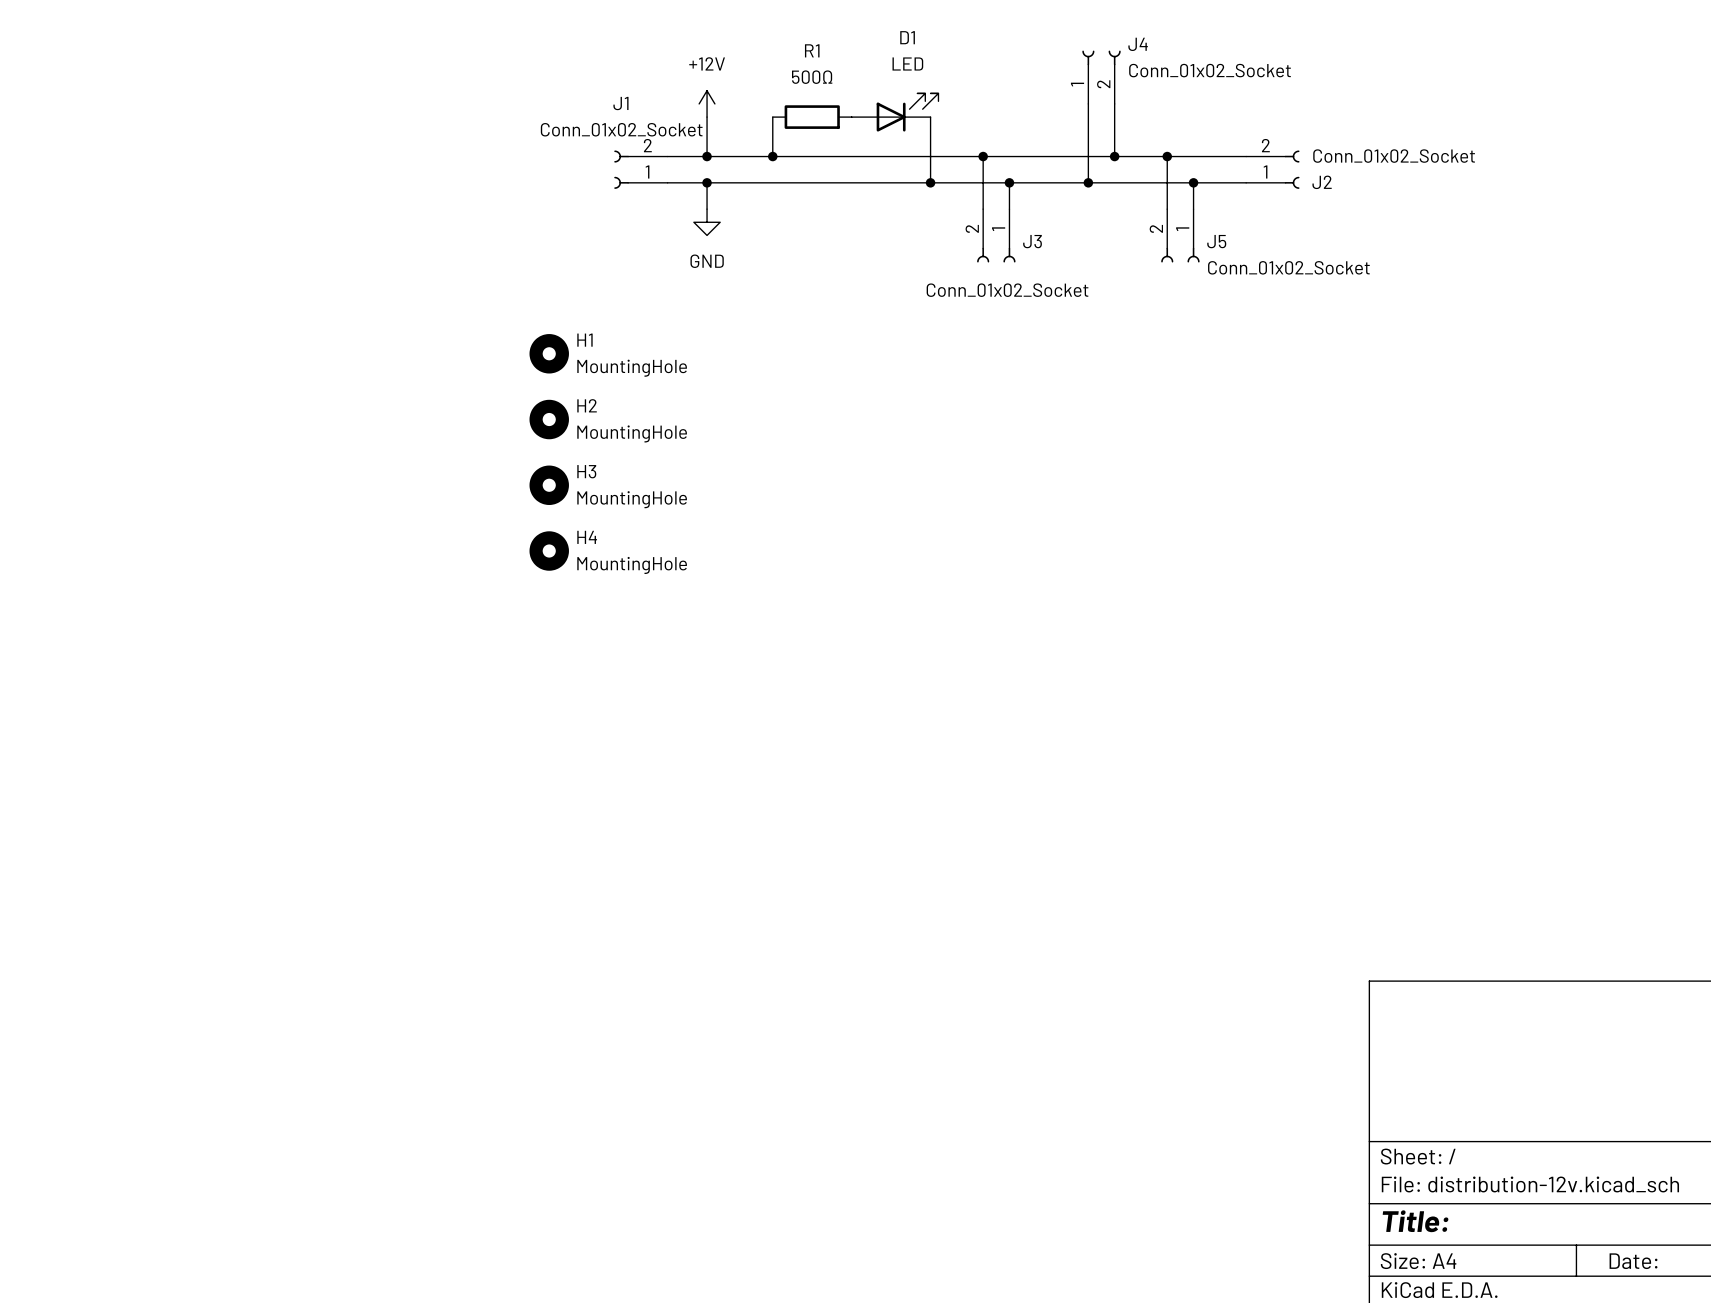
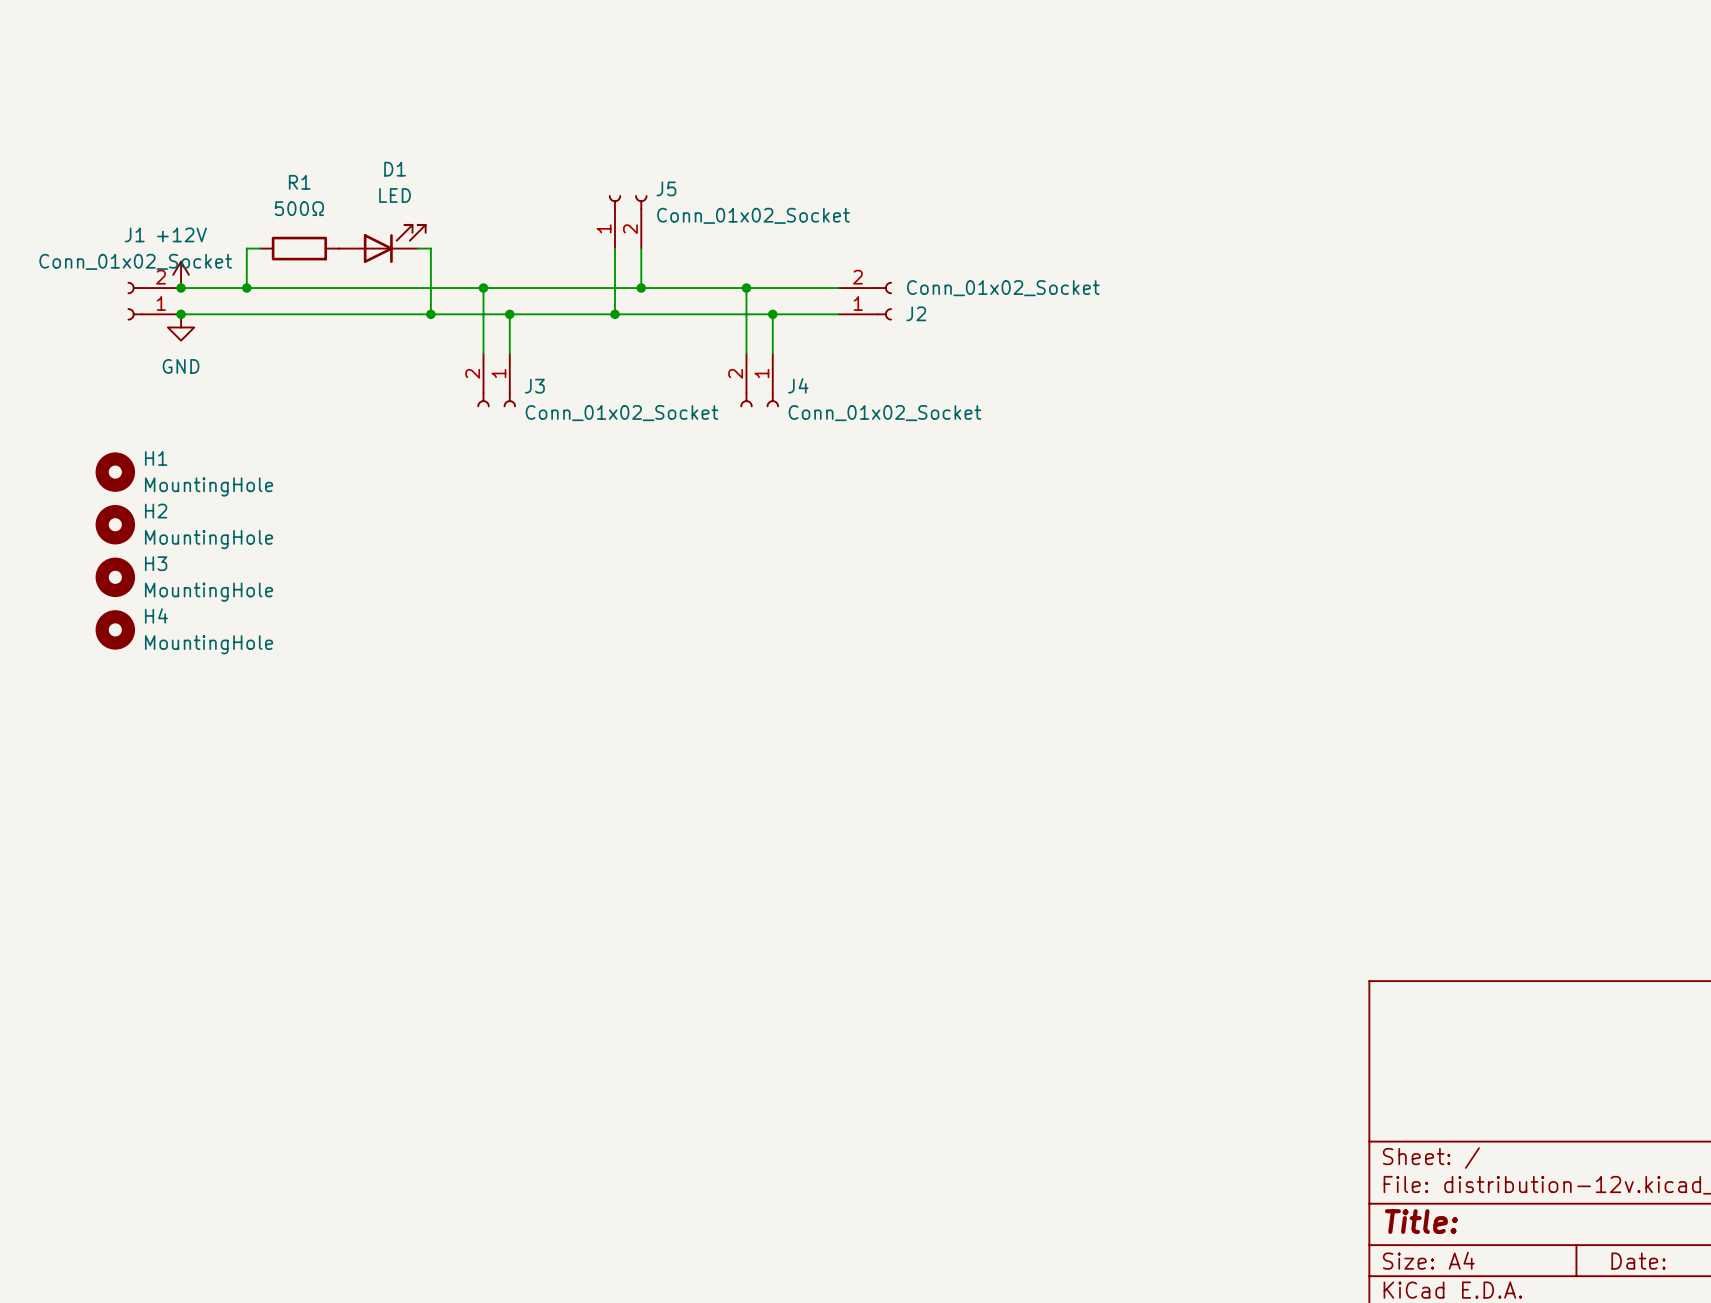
J4 name position: J4 (1138, 44) -> J4 (798, 385)
J4 rotation: 0° (1101, 57) -> 180° (759, 399)
J4 value position: Conn_01x02_Socket (1210, 70) -> Conn_01x02_Socket (884, 413)
J4 position: (1101, 77) -> (759, 380)
power symbol: +12V (707, 103) -> none
wire: (1088, 103) (1088, 182) -> none
wire: (1114, 103) (1114, 156) -> none
D1 position: (895, 112) -> (382, 243)
wire: (707, 117) (707, 156) -> (641, 248) (641, 288)
wire: (772, 117) (772, 156) -> (772, 314) (772, 353)
R1 position: (812, 117) -> (299, 248)
wire: (930, 117) (930, 182) -> (746, 288) (746, 353)
wire: (667, 156) (1246, 156) -> none
junction: (707, 156) -> none
junction: (772, 156) -> none
wire: (983, 156) (983, 209) -> none
junction: (983, 156) -> none
junction: (1114, 156) -> none
wire: (1167, 156) (1167, 209) -> none
junction: (1167, 156) -> none
J1 position: (640, 169) -> (154, 301)
J2 position: (1272, 169) -> (865, 301)
wire: (667, 182) (1246, 182) -> none
wire: (707, 182) (707, 209) -> none
junction: (707, 182) -> none
junction: (930, 182) -> none
wire: (1009, 182) (1009, 209) -> none
junction: (1009, 182) -> none
junction: (1088, 182) -> none
wire: (1193, 182) (1193, 209) -> none
junction: (1193, 182) -> none
power symbol: GND (707, 222) -> none
J3 position: (996, 235) -> (496, 380)
J5 position: (1180, 235) -> (628, 221)
J5 name position: J5 (1216, 241) -> J5 (666, 188)
wire: none -> (259, 248) (246, 248) (246, 288)
wire: none -> (417, 248) (430, 248) (430, 314)
wire: none -> (614, 248) (614, 314)
J5 rotation: 0° (1180, 255) -> 180° (628, 202)
J5 value position: Conn_01x02_Socket (1288, 267) -> Conn_01x02_Socket (753, 215)
power symbol: none -> +12V (181, 274)
wire: none -> (181, 288) (838, 288)
junction: none -> (181, 288)
junction: none -> (246, 288)
wire: none -> (483, 288) (483, 353)
junction: none -> (483, 288)
junction: none -> (641, 288)
junction: none -> (746, 288)
J3 value position: Conn_01x02_Socket (1007, 290) -> Conn_01x02_Socket (621, 413)
wire: none -> (181, 314) (838, 314)
junction: none -> (181, 314)
junction: none -> (430, 314)
wire: none -> (509, 314) (509, 353)
junction: none -> (509, 314)
junction: none -> (614, 314)
junction: none -> (772, 314)
power symbol: none -> GND (181, 327)
H1 position: (549, 353) -> (115, 472)
H2 position: (549, 419) -> (115, 524)
H3 position: (549, 485) -> (115, 577)
H4 position: (549, 551) -> (115, 629)

